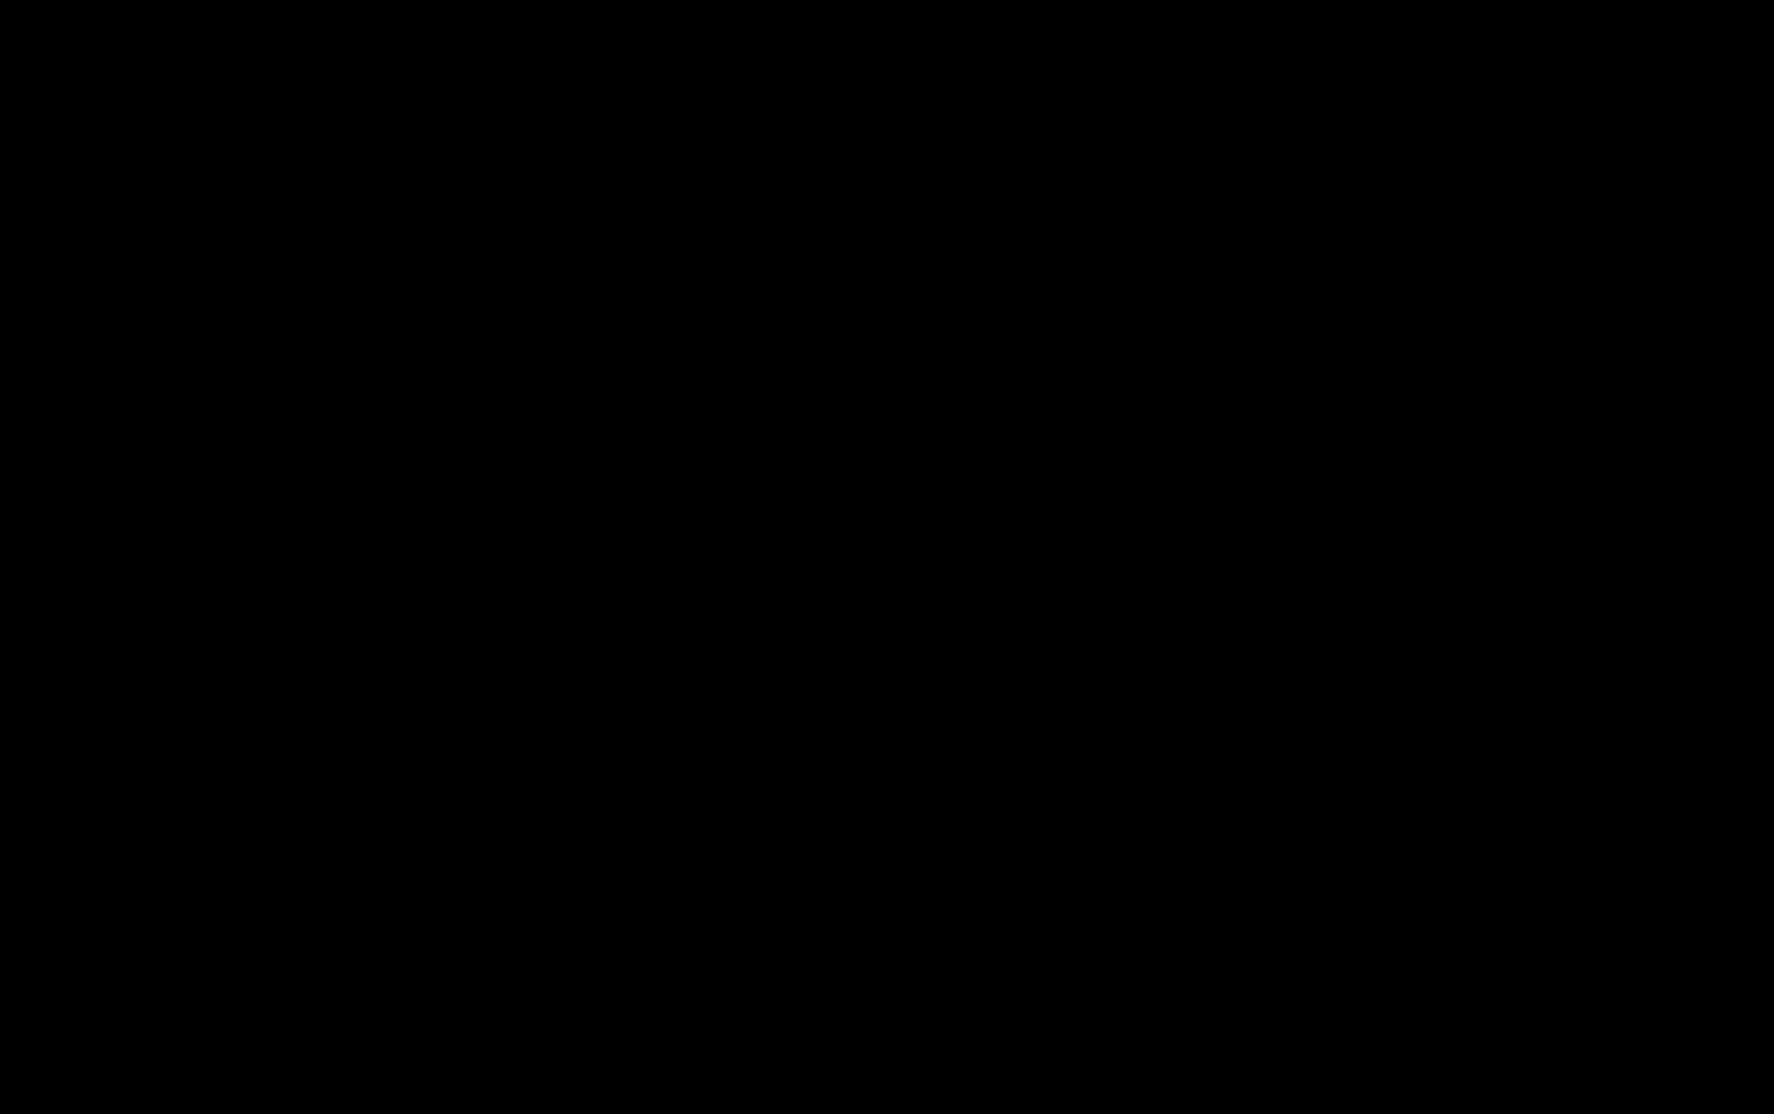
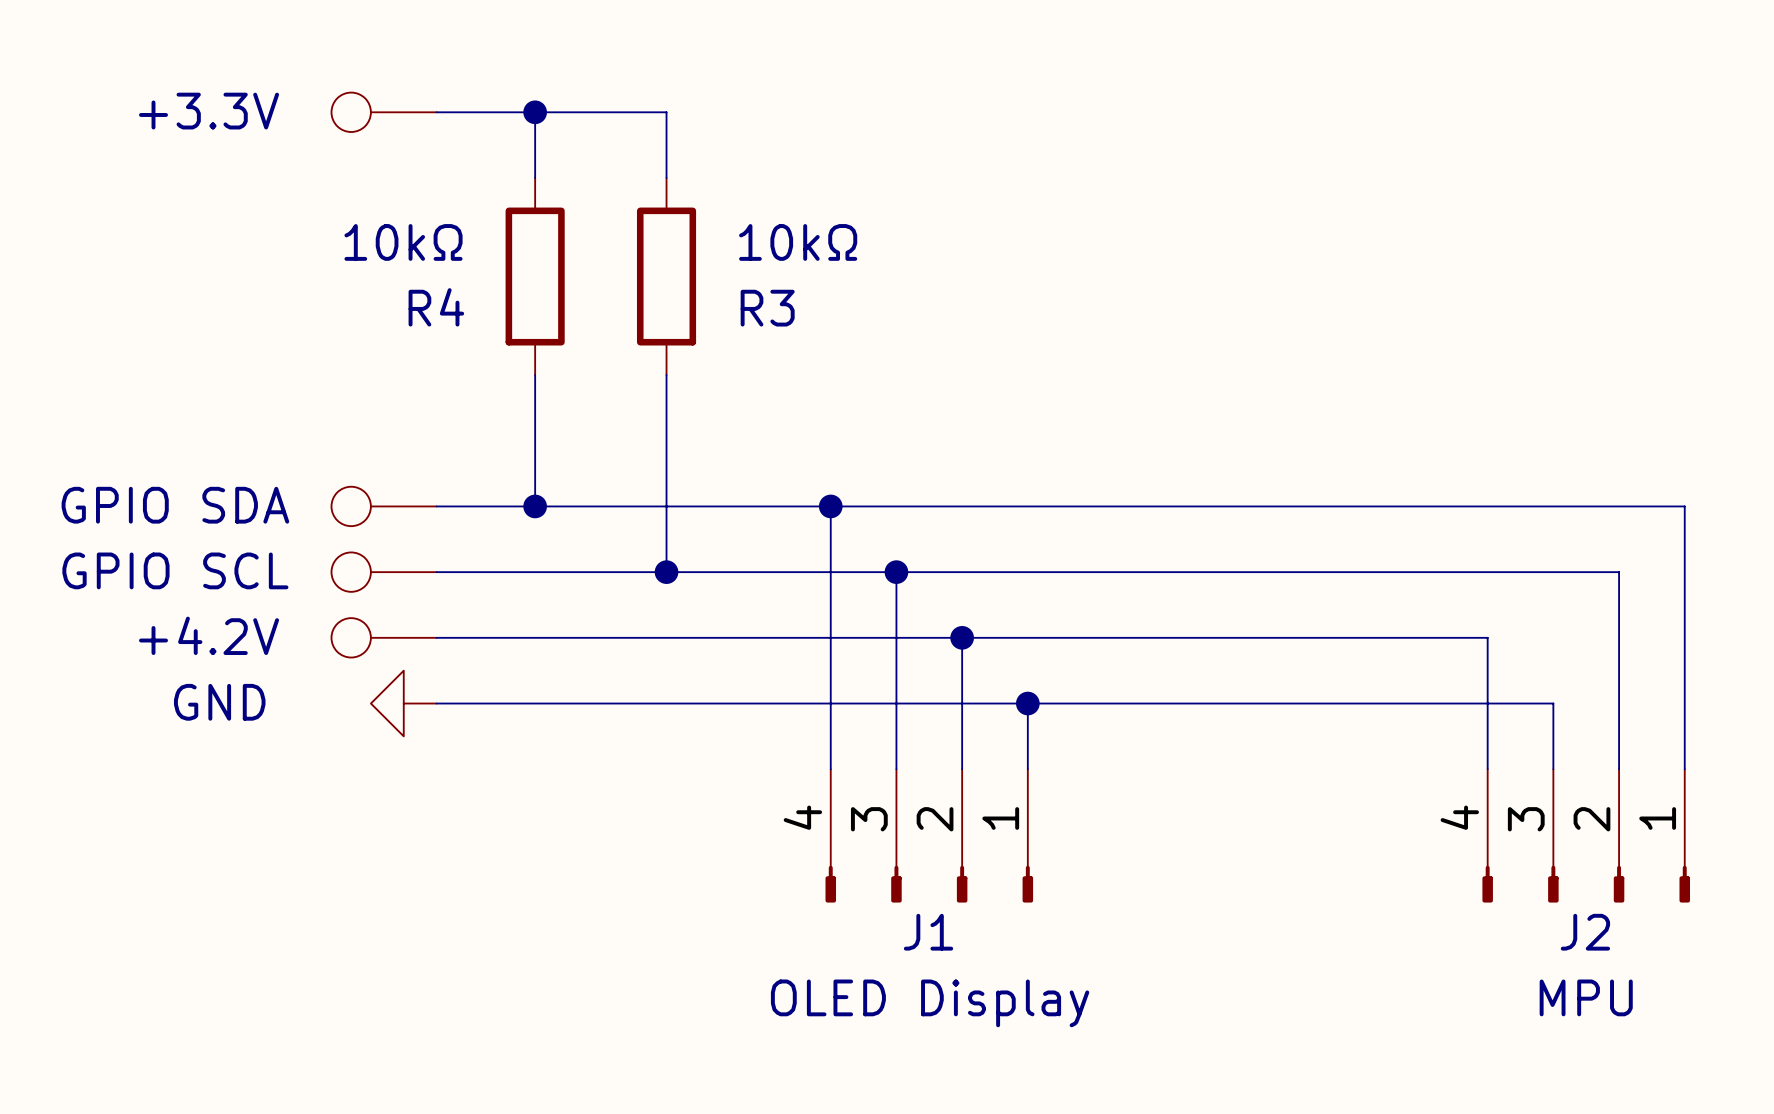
part: none -> +3.3V (384, 112)
wire: none -> (436, 112) (666, 112) (666, 177)
wire: none -> (535, 112) (535, 177)
junction: none -> (535, 112)
R4: none -> 10kΩ (535, 276)
R3: none -> 10kΩ (666, 276)
wire: none -> (535, 375) (535, 506)
wire: none -> (666, 375) (666, 572)
part: none -> GPIO SDA (384, 506)
wire: none -> (436, 506) (1684, 506) (1684, 769)
junction: none -> (535, 506)
wire: none -> (830, 506) (830, 769)
junction: none -> (830, 506)
part: none -> GPIO SCL (384, 572)
wire: none -> (436, 572) (1619, 572) (1619, 769)
junction: none -> (666, 572)
wire: none -> (896, 572) (896, 769)
junction: none -> (896, 572)
part: none -> +4.2V (384, 637)
wire: none -> (436, 637) (1487, 637) (1487, 769)
wire: none -> (962, 637) (962, 769)
junction: none -> (962, 637)
power symbol: none -> GND (403, 703)
wire: none -> (436, 703) (1553, 703) (1553, 769)
wire: none -> (1027, 703) (1027, 769)
junction: none -> (1027, 703)
J1: none -> OLED Display (929, 835)
J2: none -> MPU (1586, 835)

